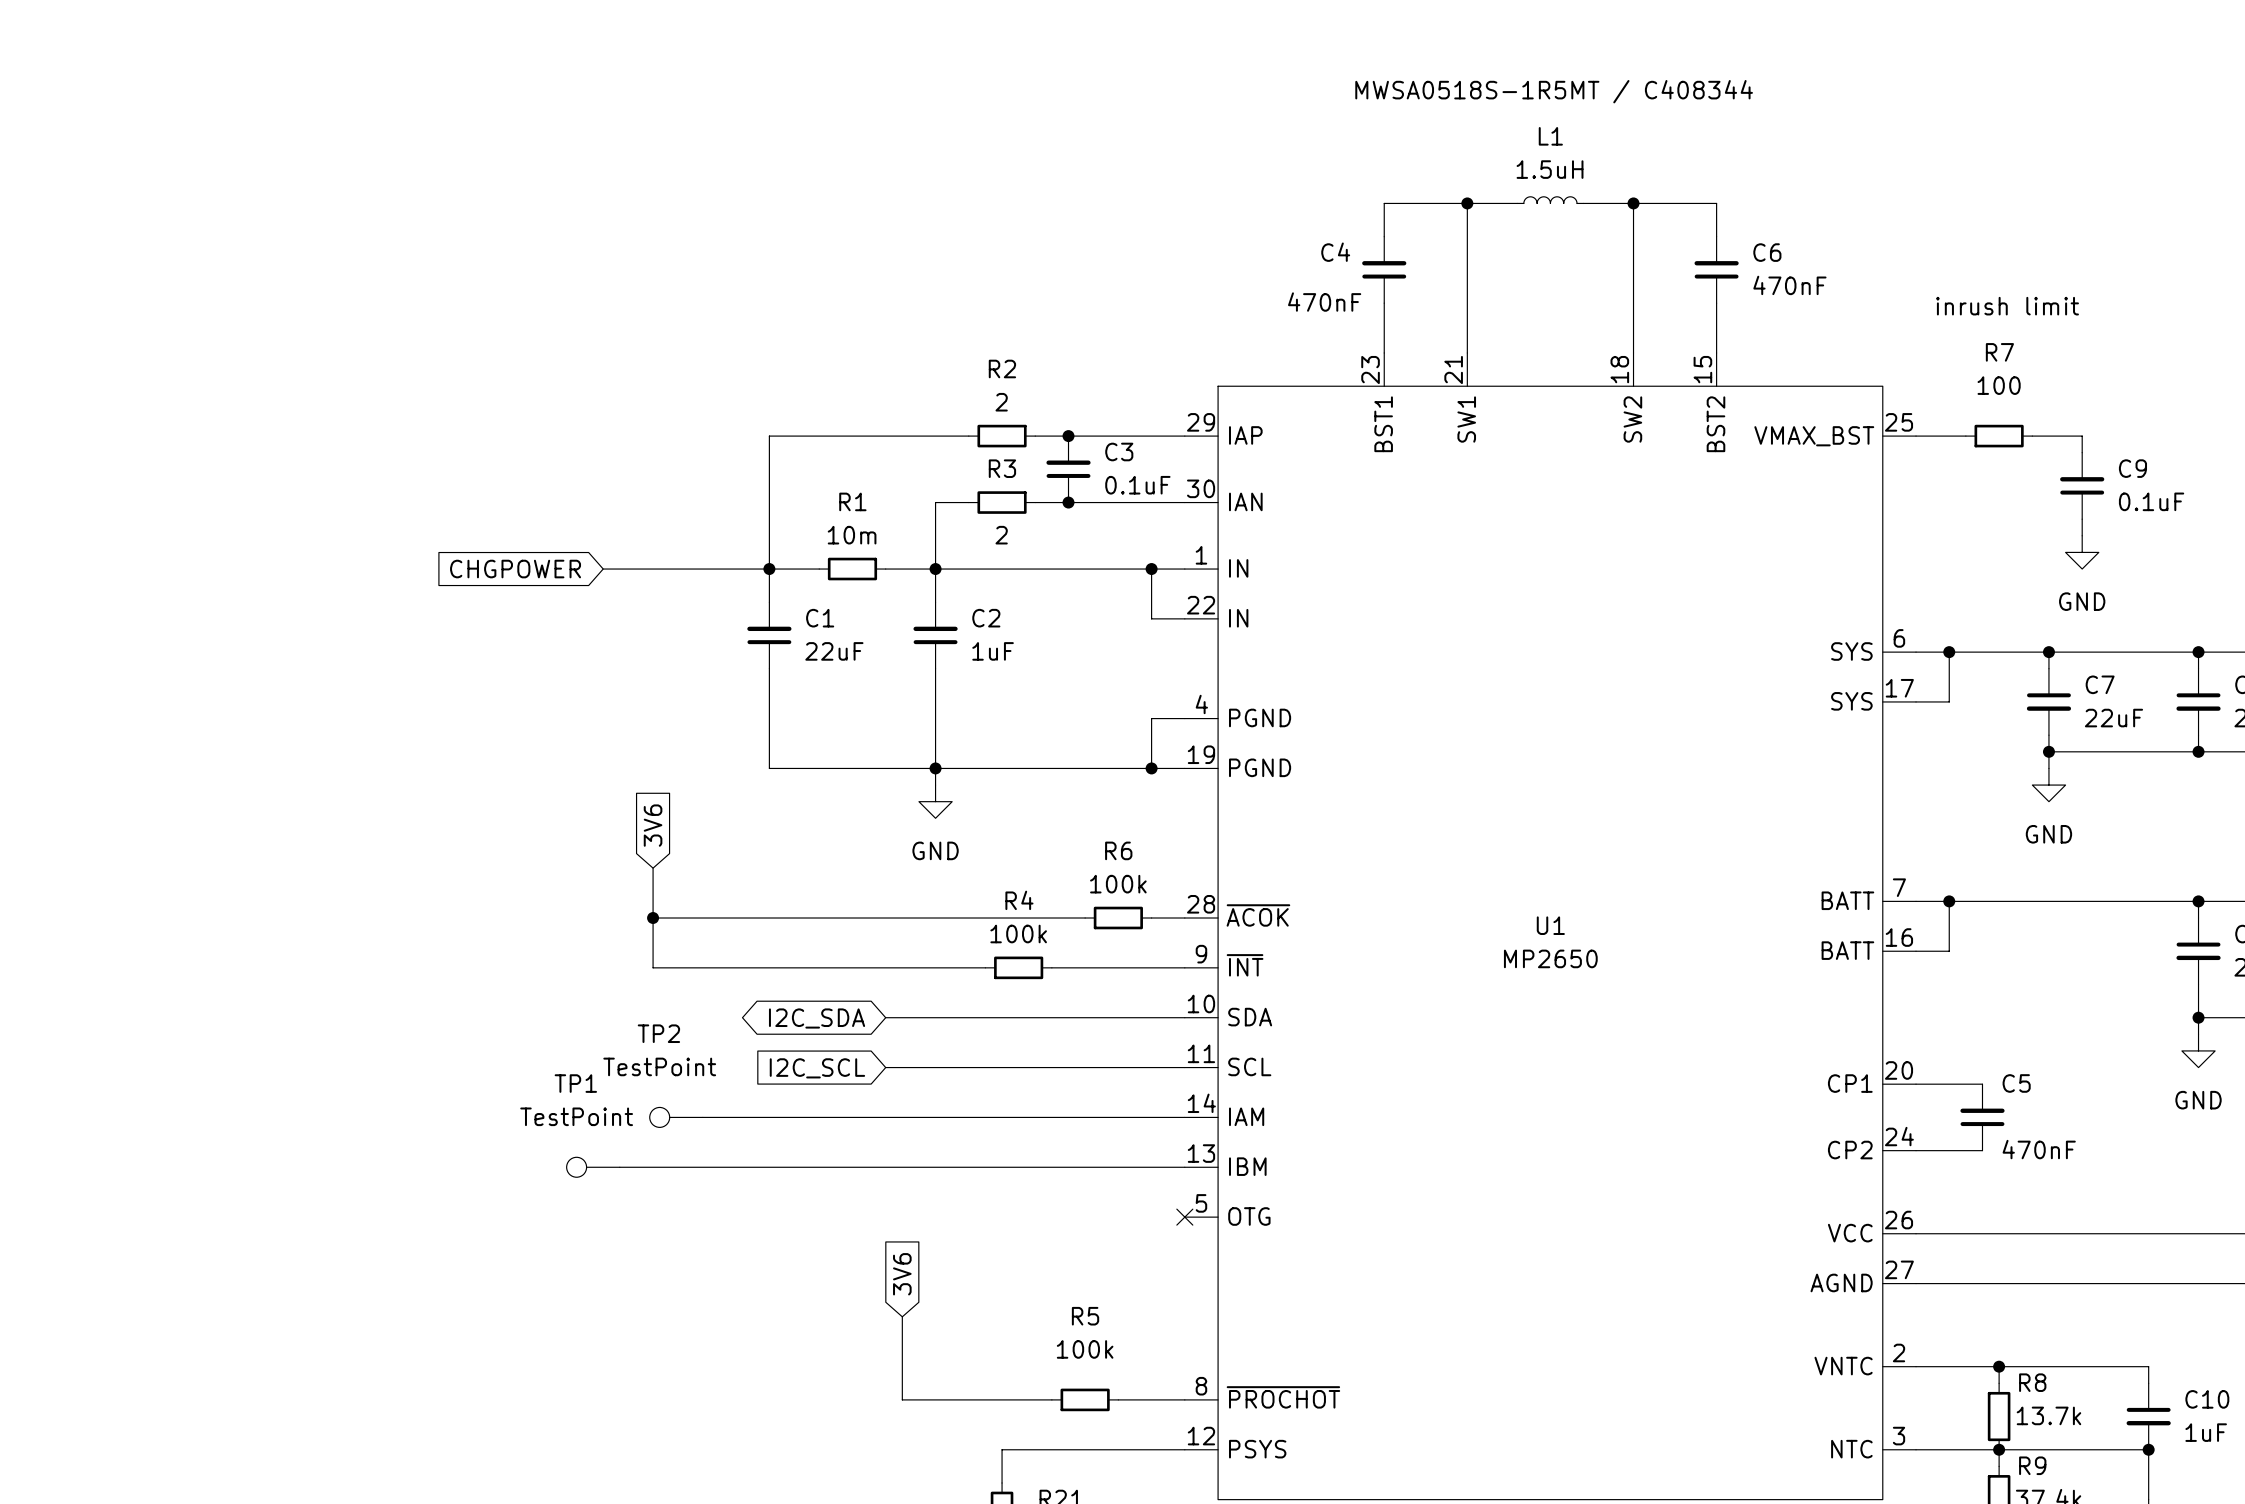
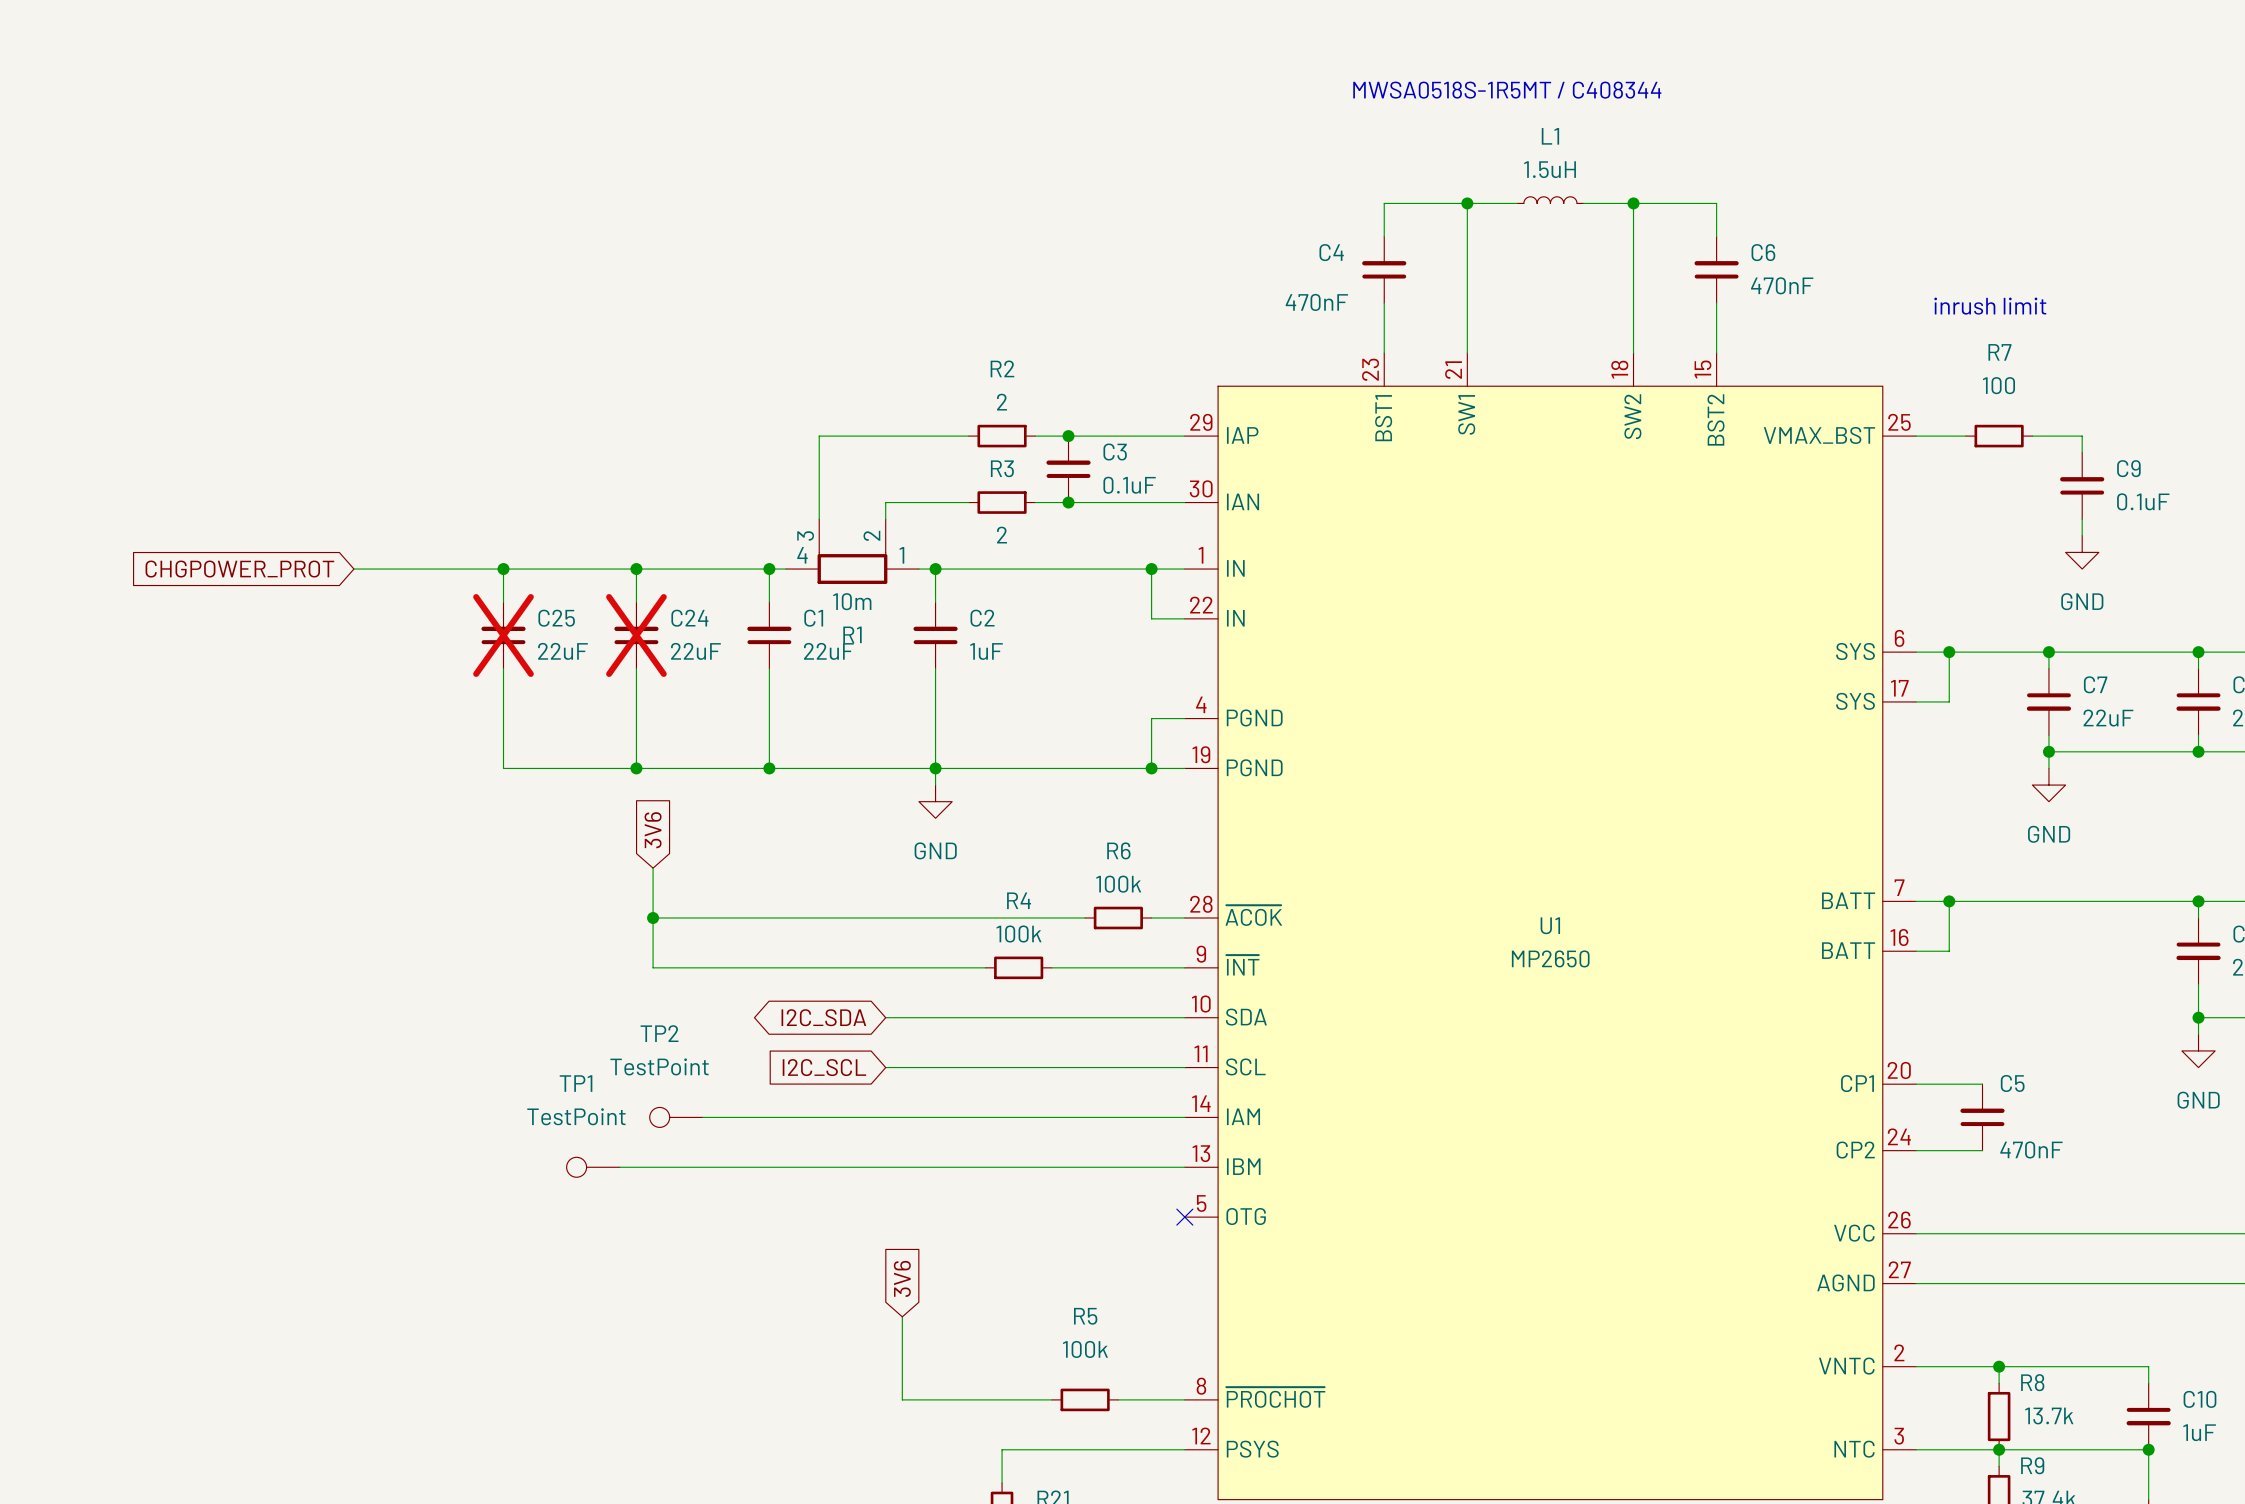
wire: (819, 436) (769, 436) (769, 569) -> (819, 436) (819, 519)
R1 name position: R1 (852, 501) -> R1 (852, 634)
wire: (935, 502) (935, 569) -> (935, 502) (885, 502) (885, 519)
R1 value position: 10m (852, 535) -> 10m (852, 601)
R1 symbol: [819, 557, 886, 581] -> [786, 519, 919, 584]
global label: none -> CHGPOWER_PROT (239, 569)
wire: none -> (353, 569) (603, 569)
wire: none -> (503, 569) (503, 602)
junction: none -> (503, 569)
global label: CHGPOWER (515, 569) -> none
wire: none -> (636, 569) (636, 602)
junction: none -> (636, 569)
C25: none -> 22uF (503, 635)
C24: none -> 22uF (636, 635)
wire: none -> (503, 668) (503, 768) (769, 768)
wire: none -> (636, 668) (636, 768)
junction: none -> (636, 768)
junction: none -> (769, 768)

